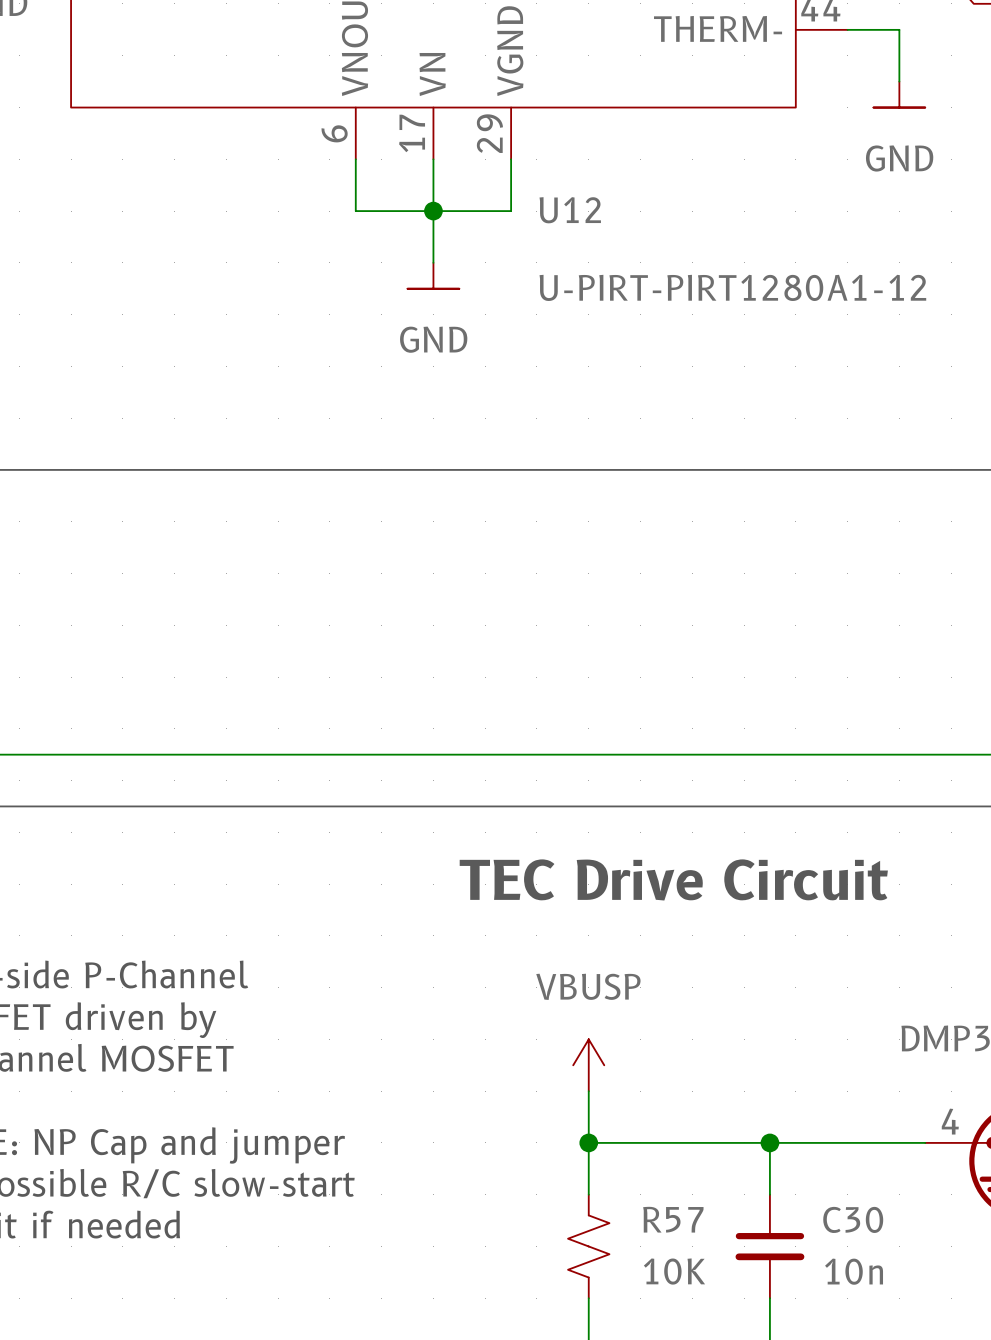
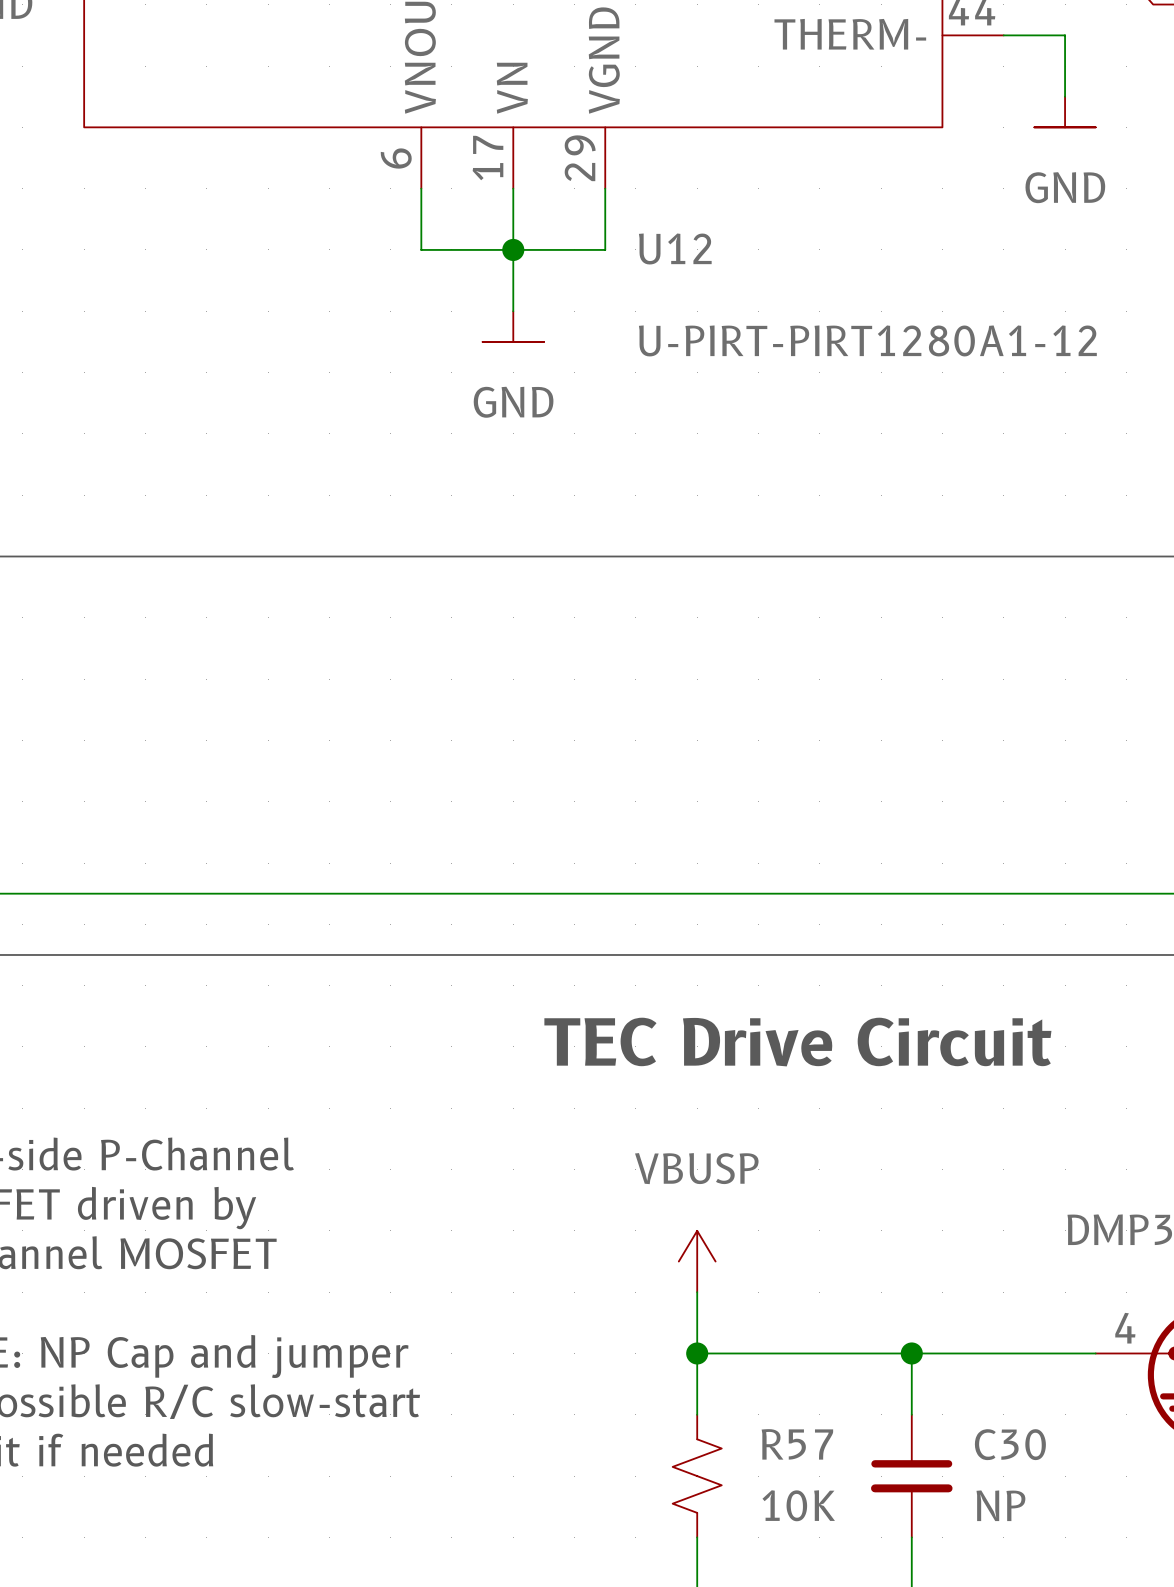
C30 value: 10n (854, 1271) -> NP (1000, 1505)

